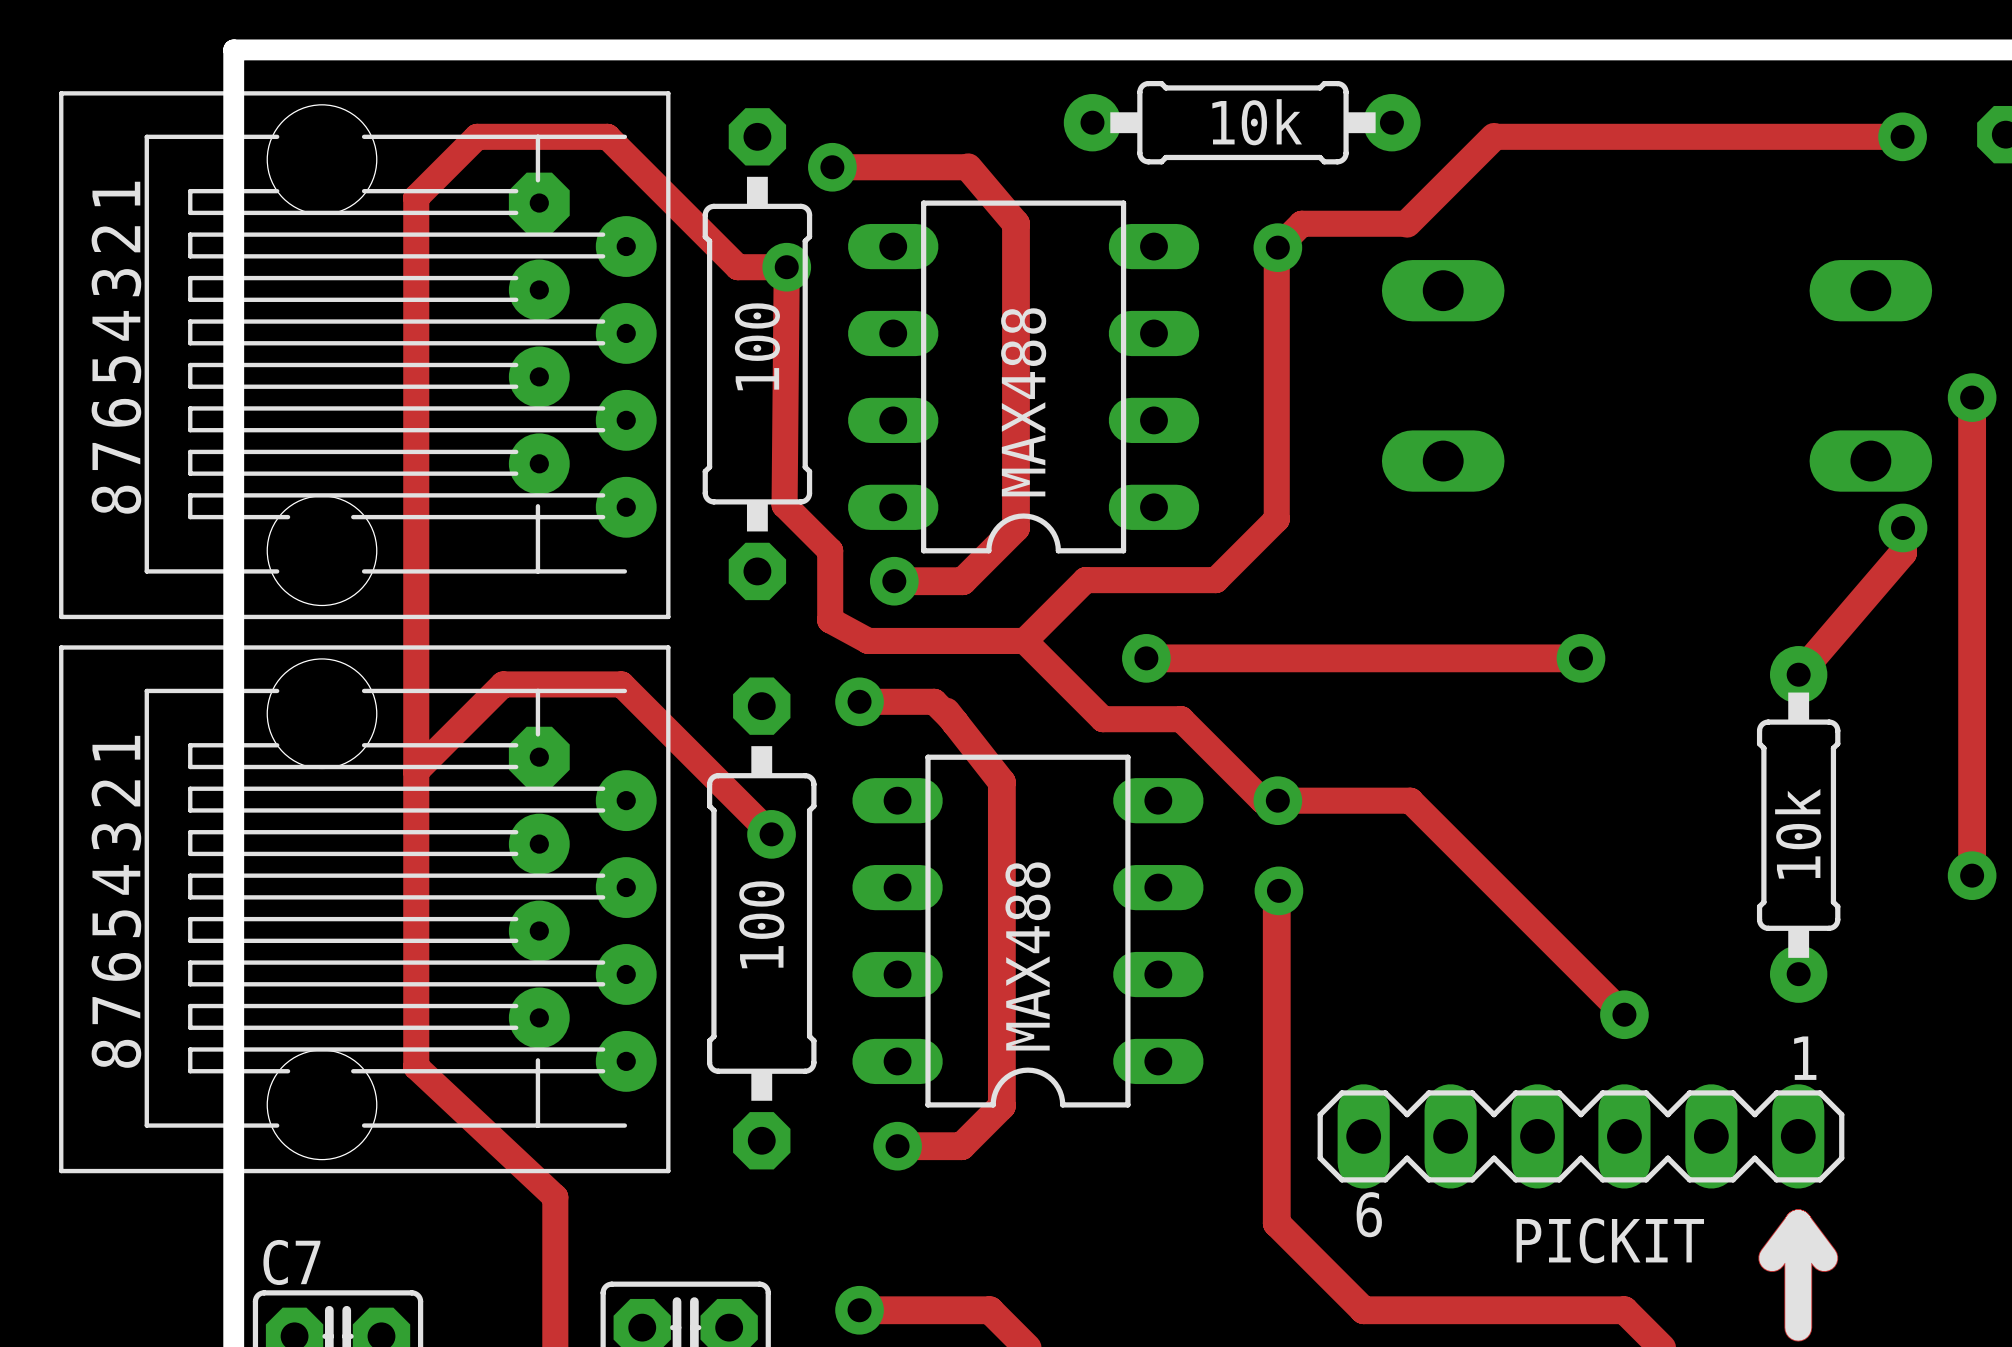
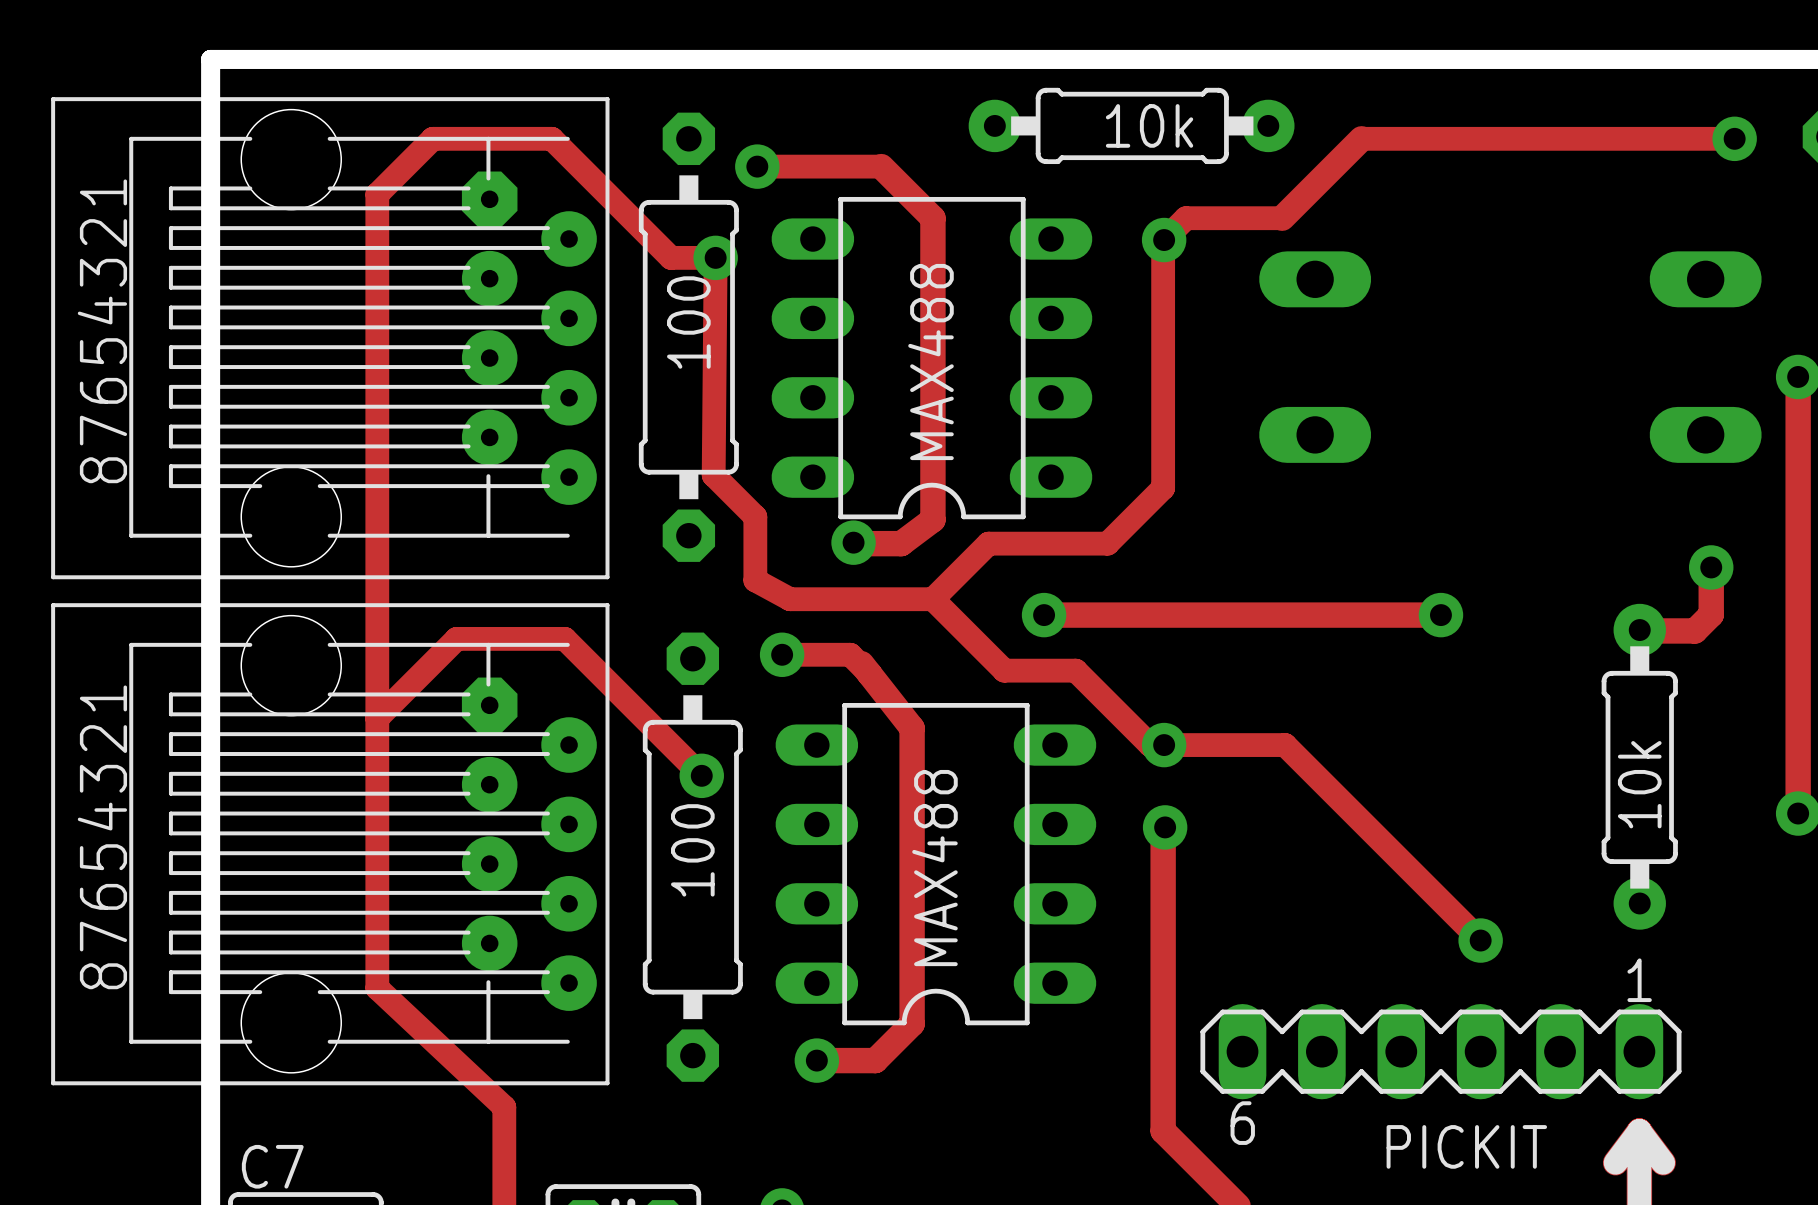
track: (968, 167) (1016, 223) (1016, 527) (962, 581) (894, 581) -> (881, 166) (932, 218) (932, 519) (901, 543) (853, 543)
track: (1903, 527) (1903, 552) (1798, 674) -> (1711, 567) (1711, 614) (1694, 630) (1639, 630)
via position: (1903, 527) -> (1711, 567)
via position: (894, 581) -> (853, 542)

